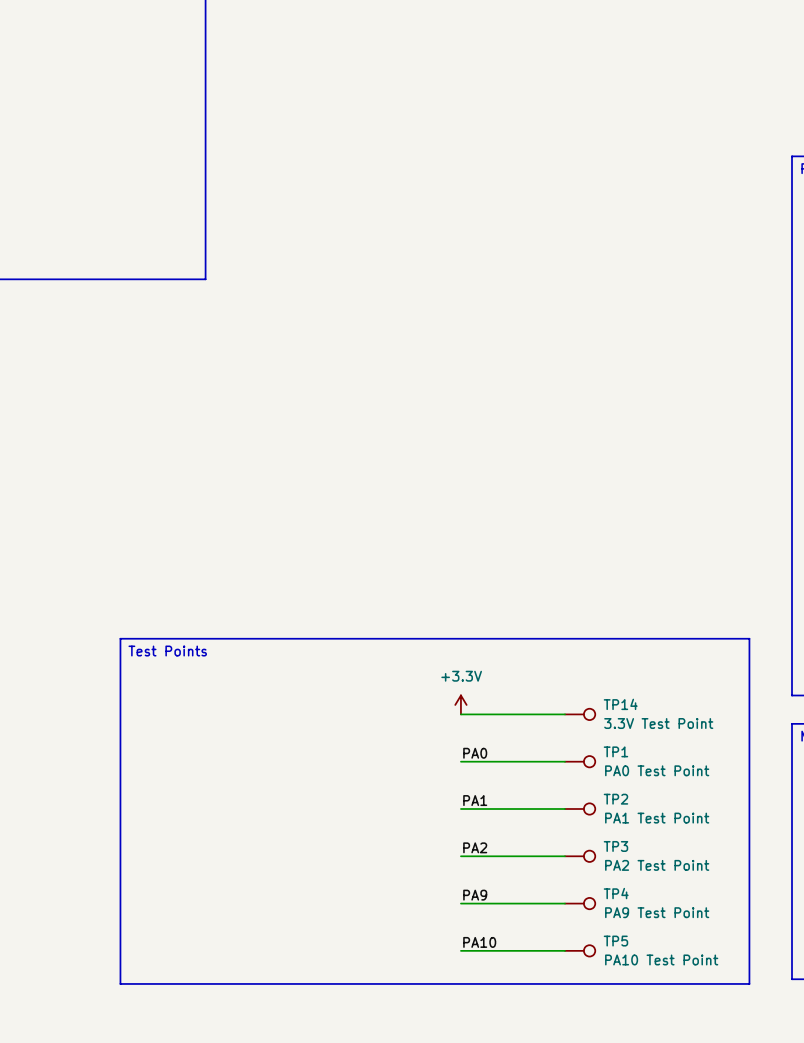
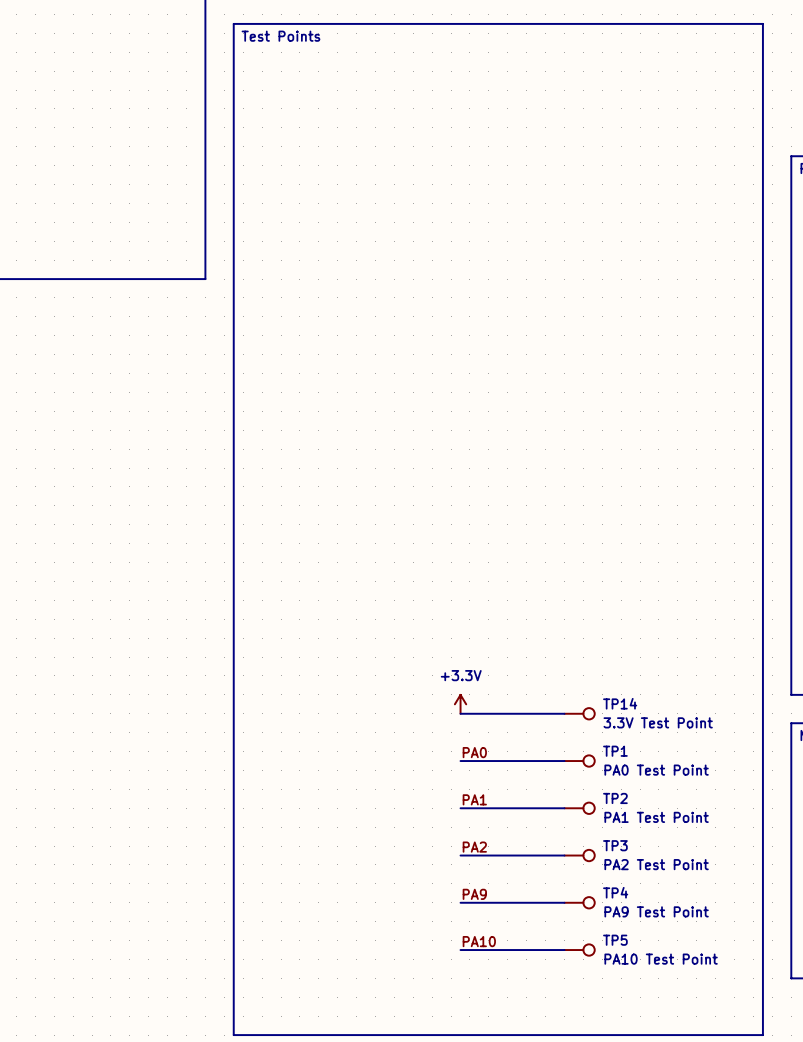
line: none -> (233, 23) (762, 23) (762, 1035) (233, 1035) (233, 23)
text: none -> Test Points (280, 36)
line: (120, 638) (749, 638) (749, 983) (120, 983) (120, 638) -> none
text: Test Points (167, 651) -> none

